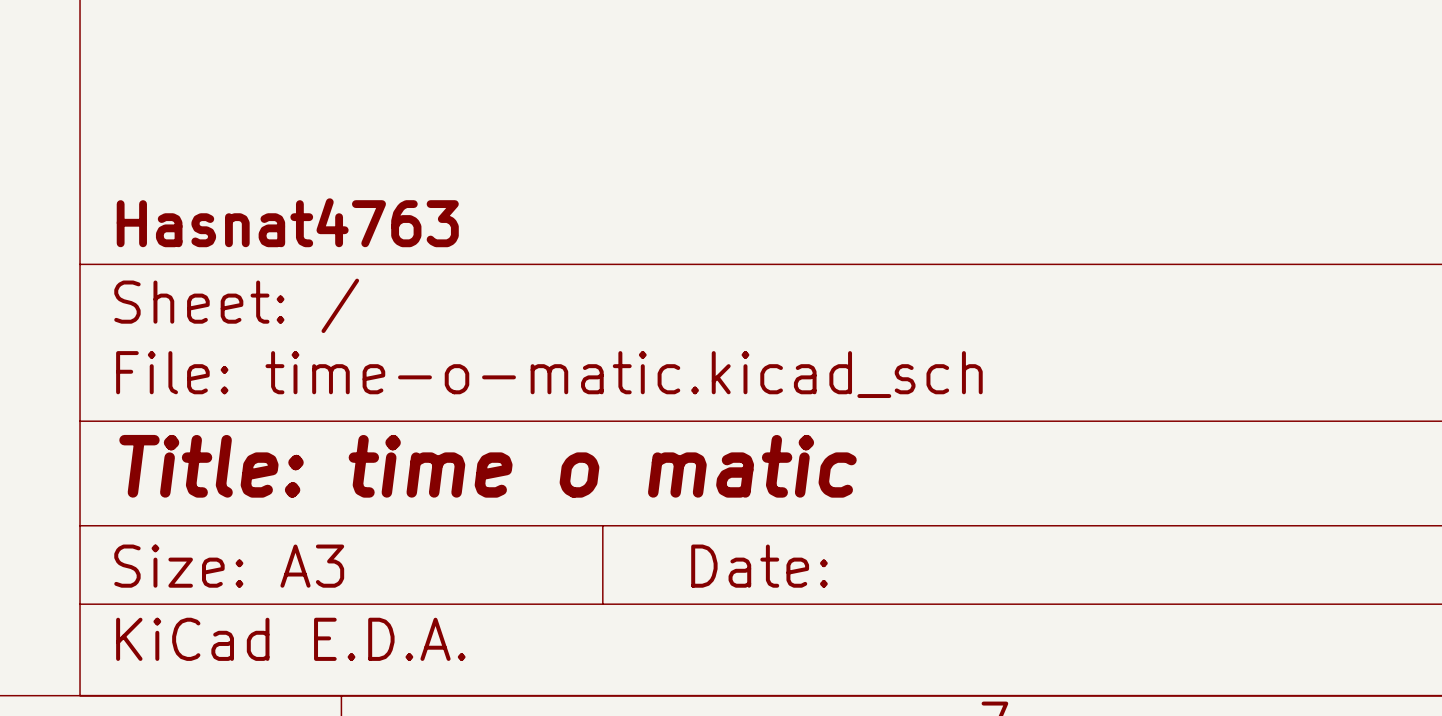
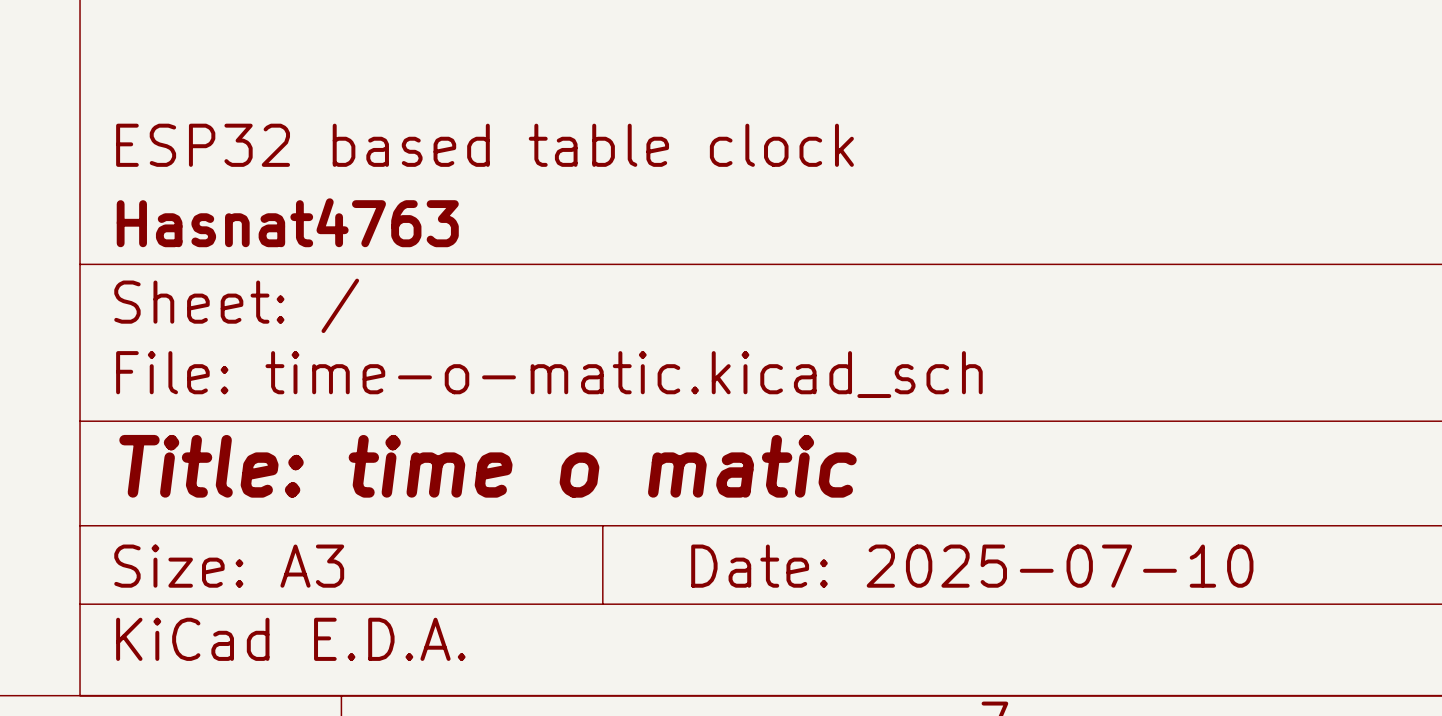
title block: none -> ESP32 based table clock (485, 145)
title block: Date: (759, 566) -> Date: 2025-07-10 (972, 566)

